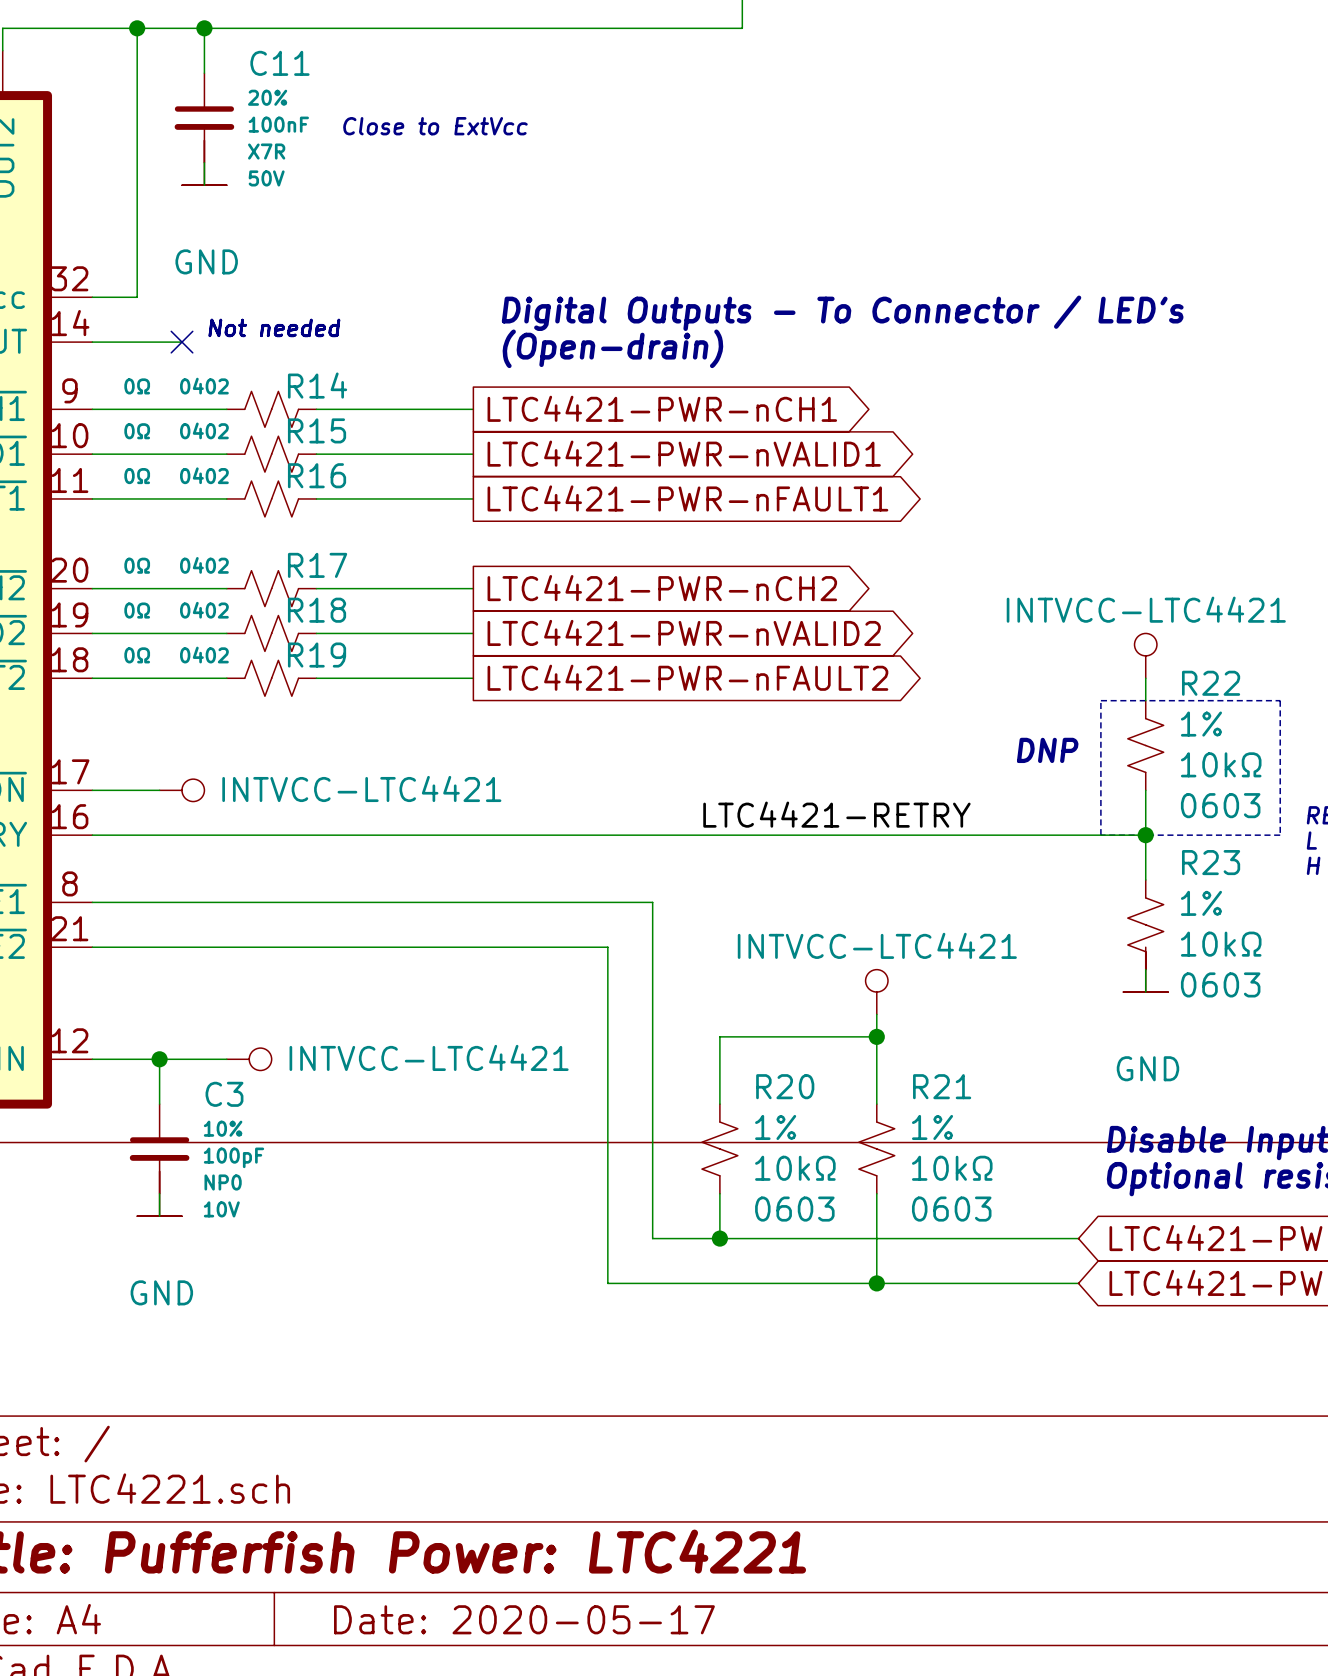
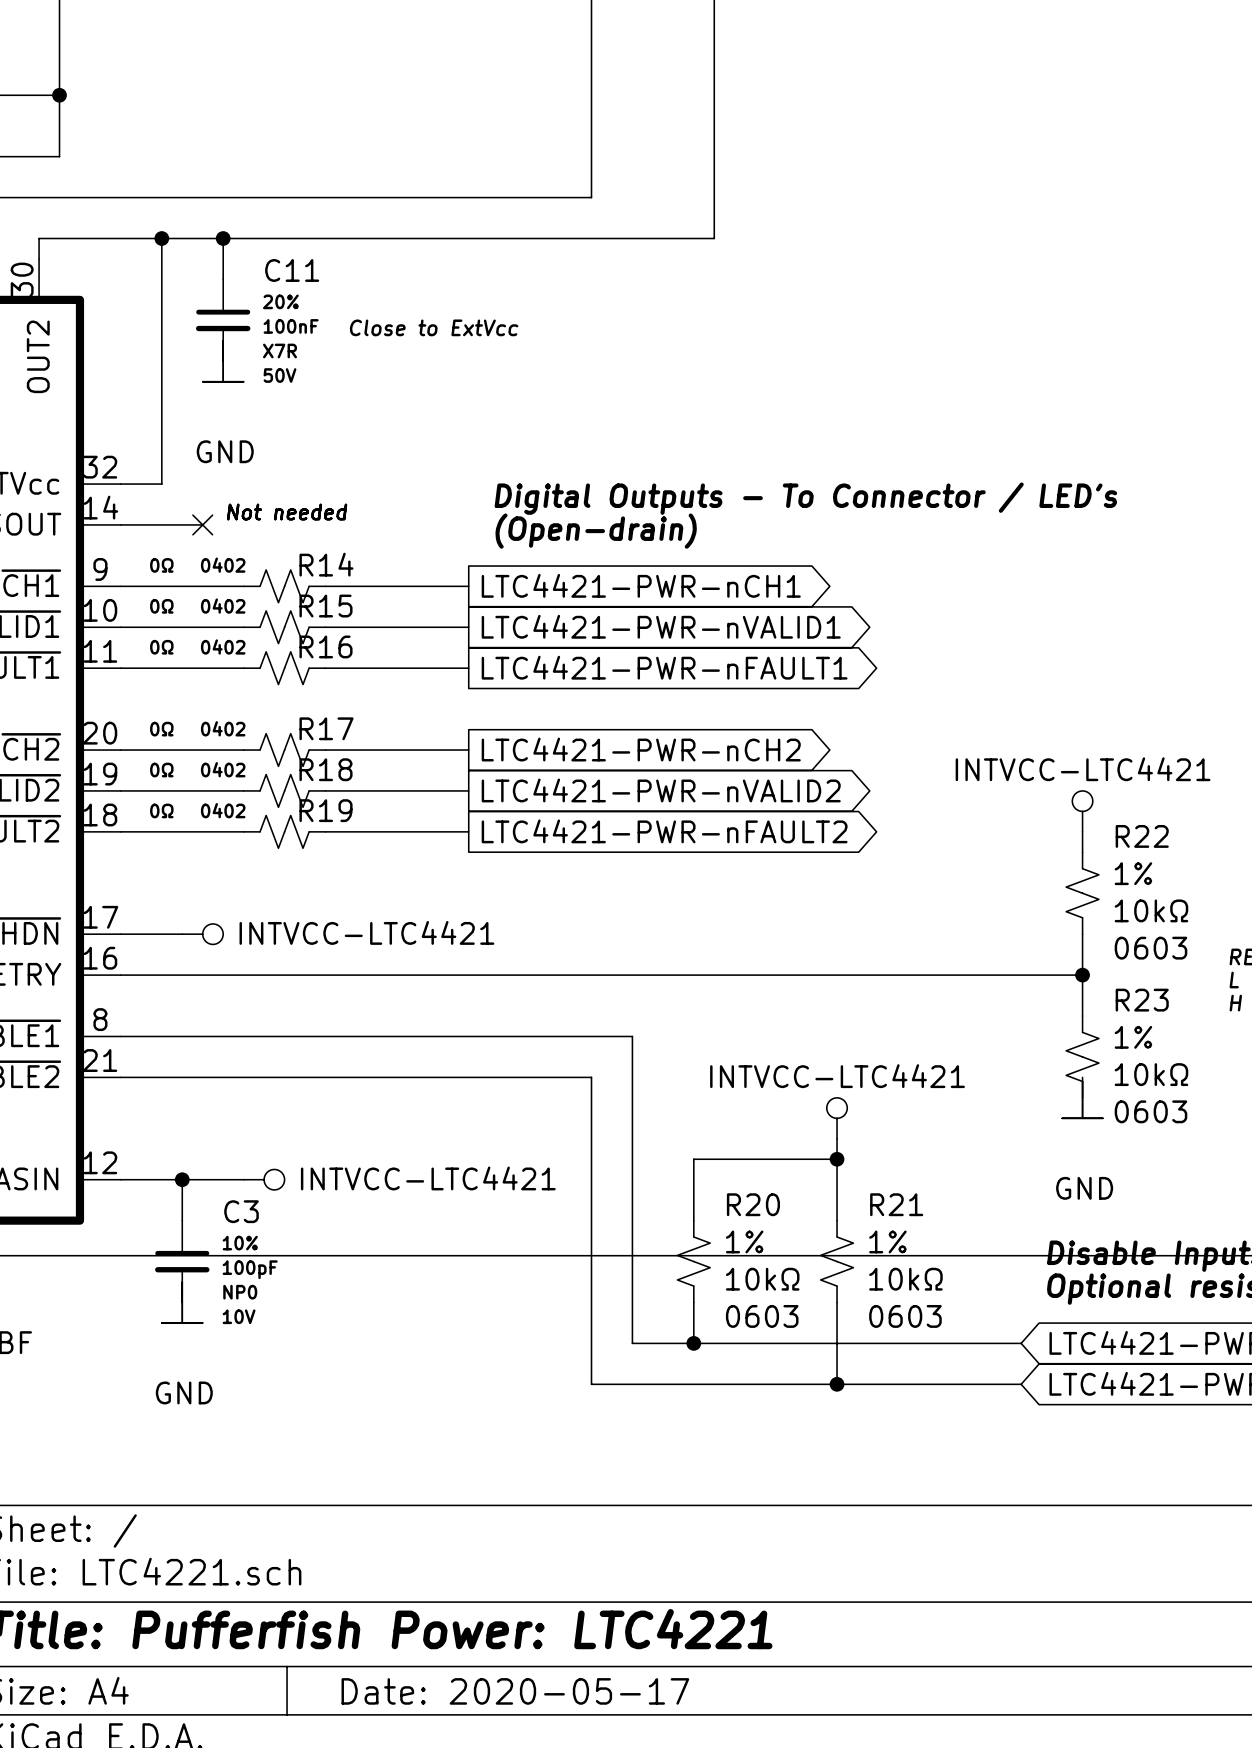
line: (1100, 700) (1280, 700) (1280, 835) (1100, 835) (1100, 700) -> none
text: DNP (1047, 750) -> none
label: LTC4421-RETRY (836, 814) -> none

